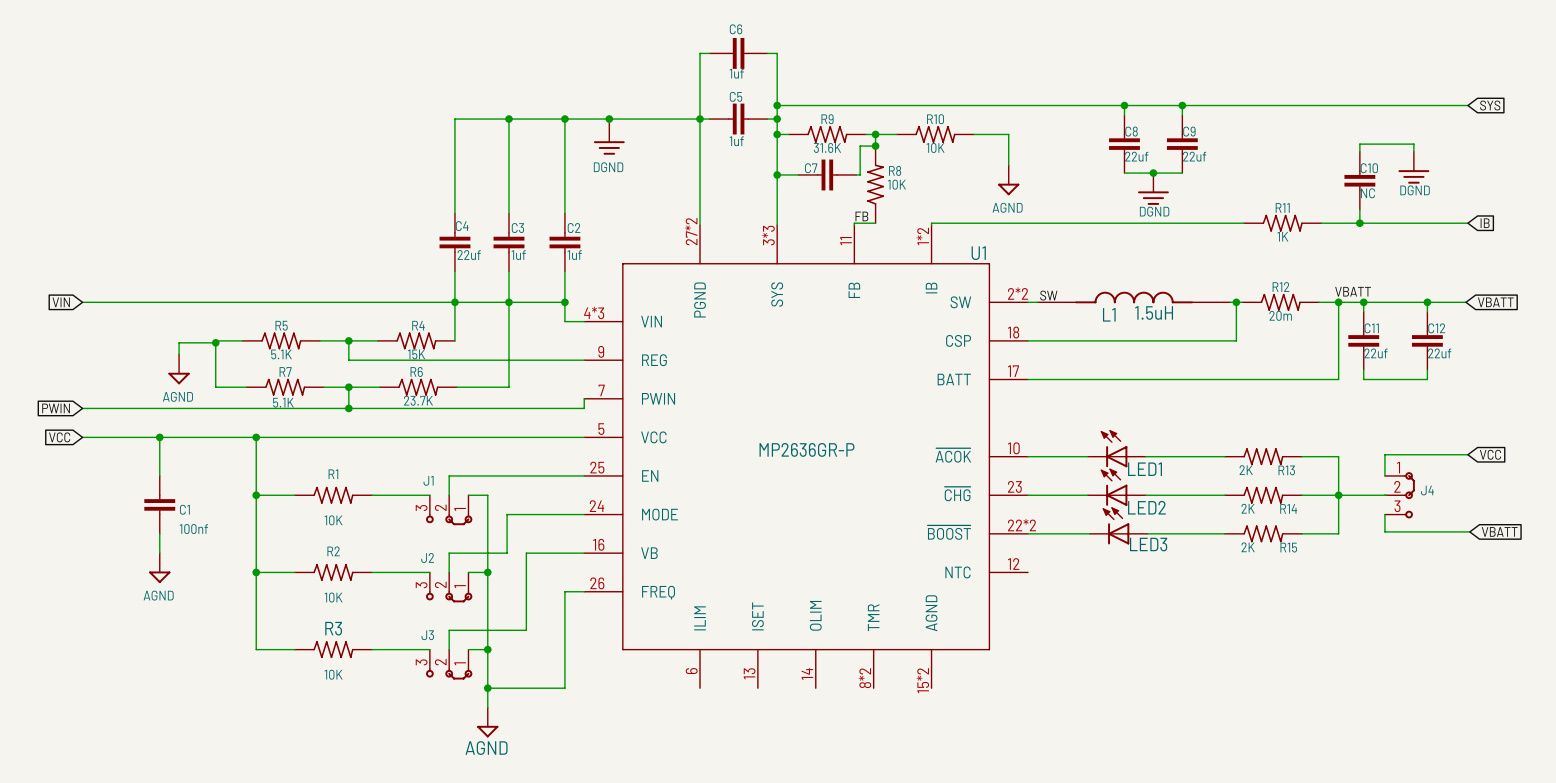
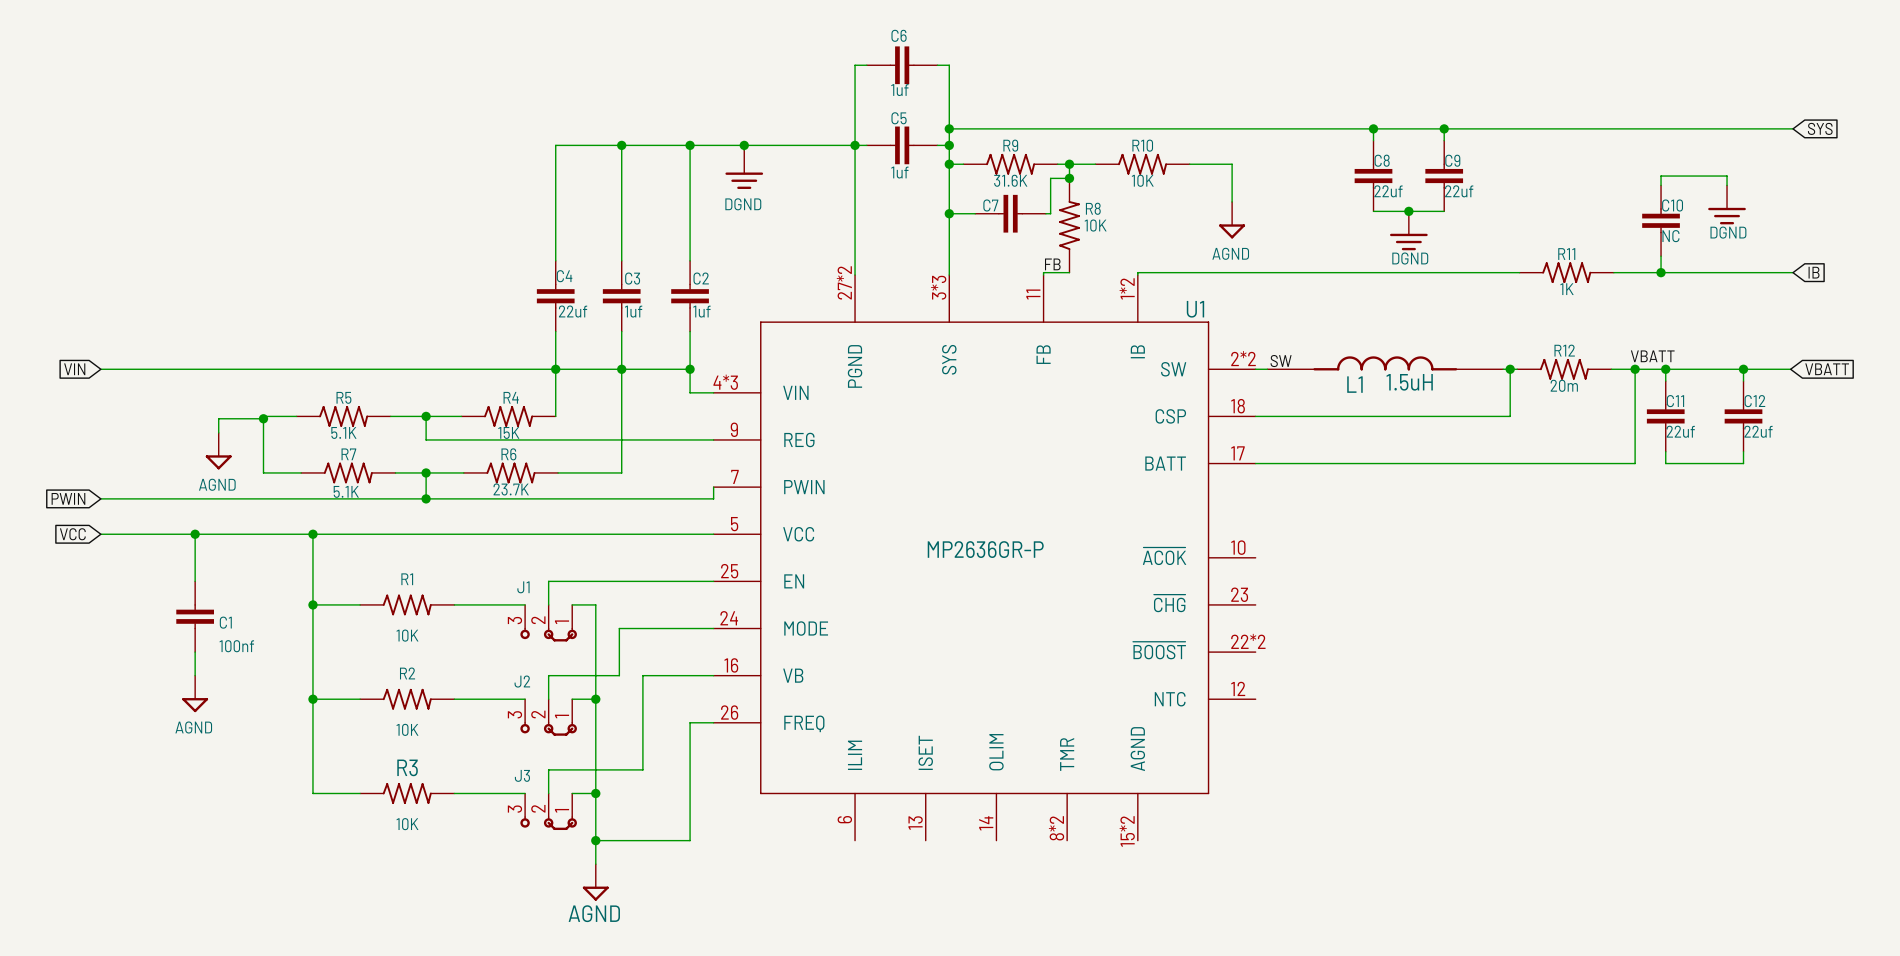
LED1: (1116, 448) -> none
wire: (1467, 454) (1384, 454) (1384, 475) -> none
global label: VCC (1490, 454) -> none
wire: (1028, 456) (1087, 456) -> none
wire: (1145, 456) (1224, 456) -> none
R13: 2K (1263, 456) -> none
wire: (1301, 456) (1338, 456) (1338, 533) (1301, 533) -> none
LED2: (1116, 487) -> none
wire: (1028, 495) (1087, 495) -> none
wire: (1145, 495) (1224, 495) -> none
R14: 2K (1263, 495) -> none
wire: (1301, 495) (1338, 495) -> none
junction: (1338, 495) -> none
wire: (1340, 495) (1386, 495) -> none
J4: (1399, 495) -> none
wire: (1384, 514) (1384, 531) (1469, 531) -> none
LED3: (1118, 525) -> none
global label: VBATT (1499, 531) -> none
wire: (1028, 533) (1089, 533) -> none
wire: (1147, 533) (1224, 533) -> none
R15: 2K (1263, 533) -> none

